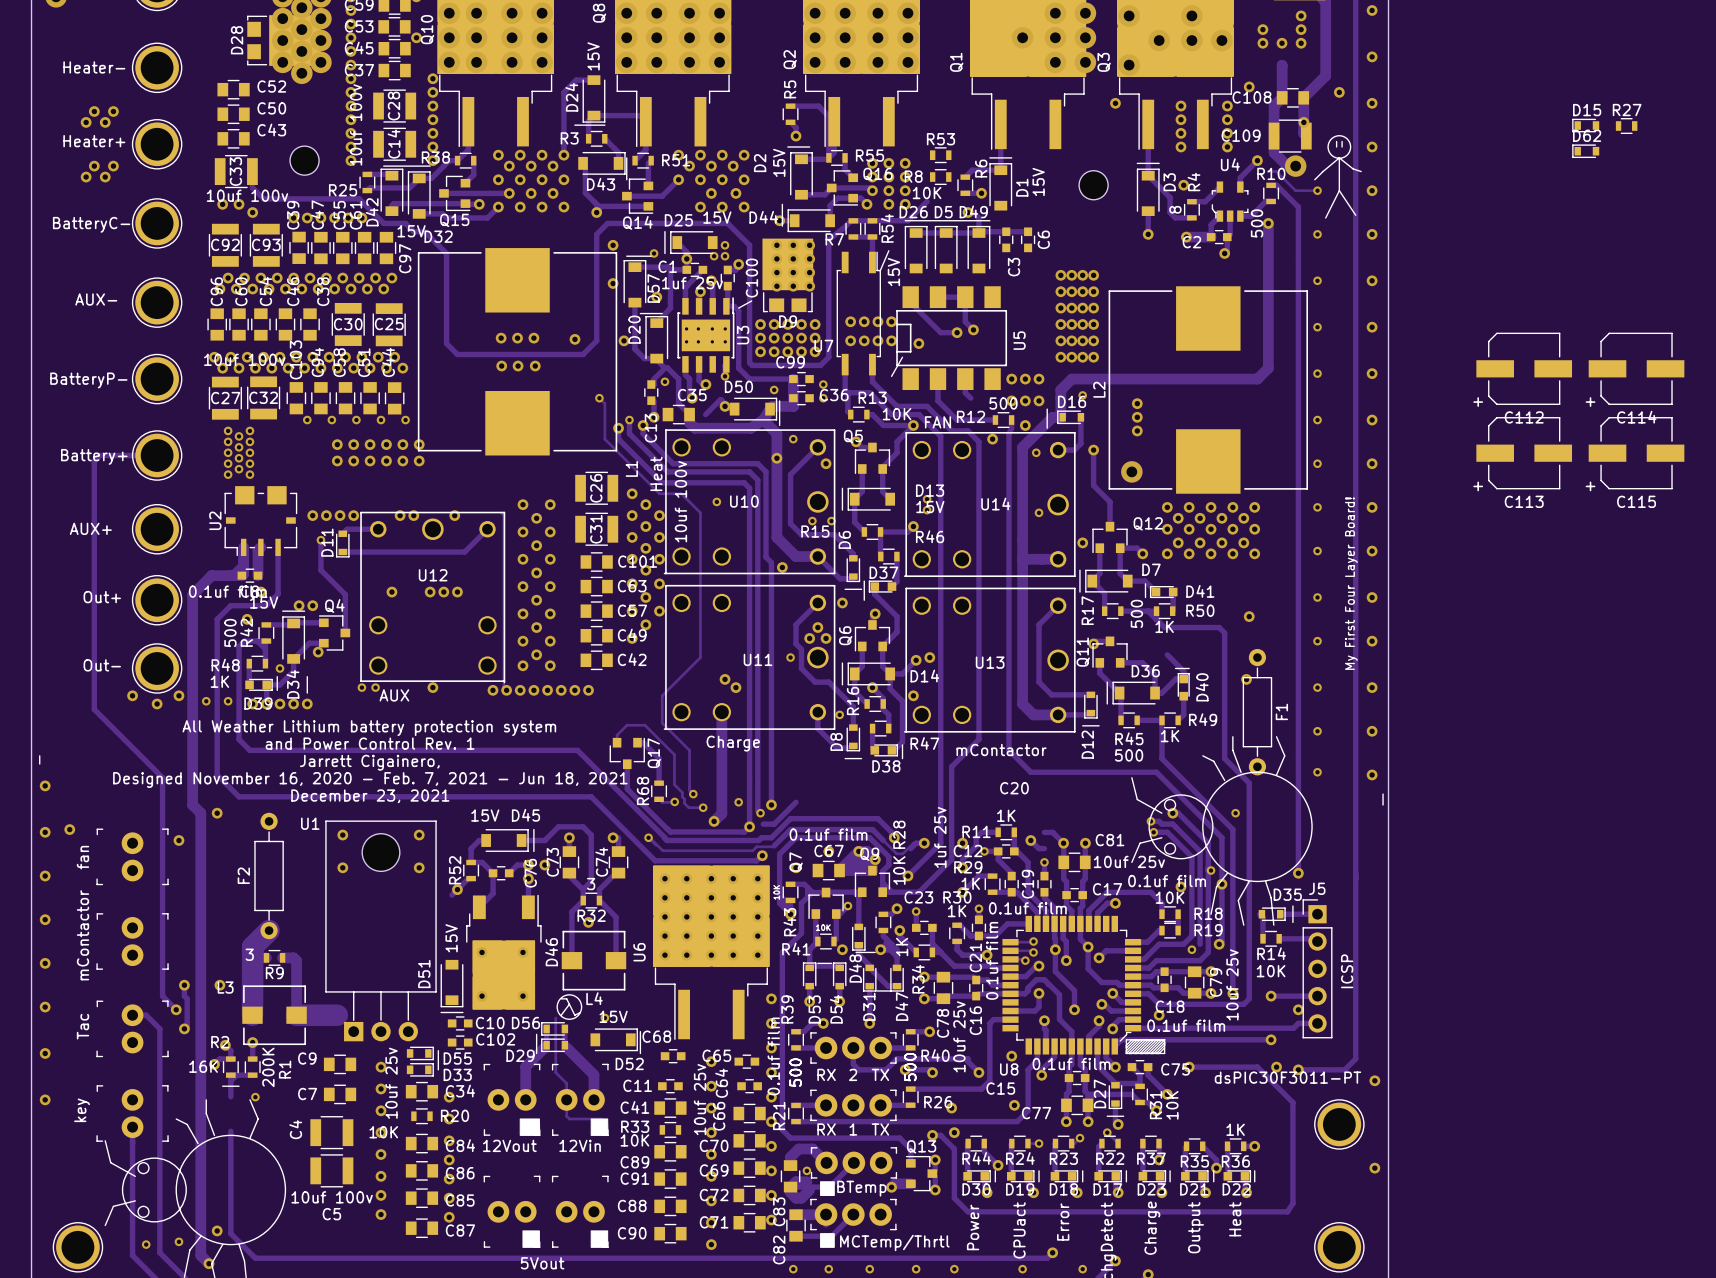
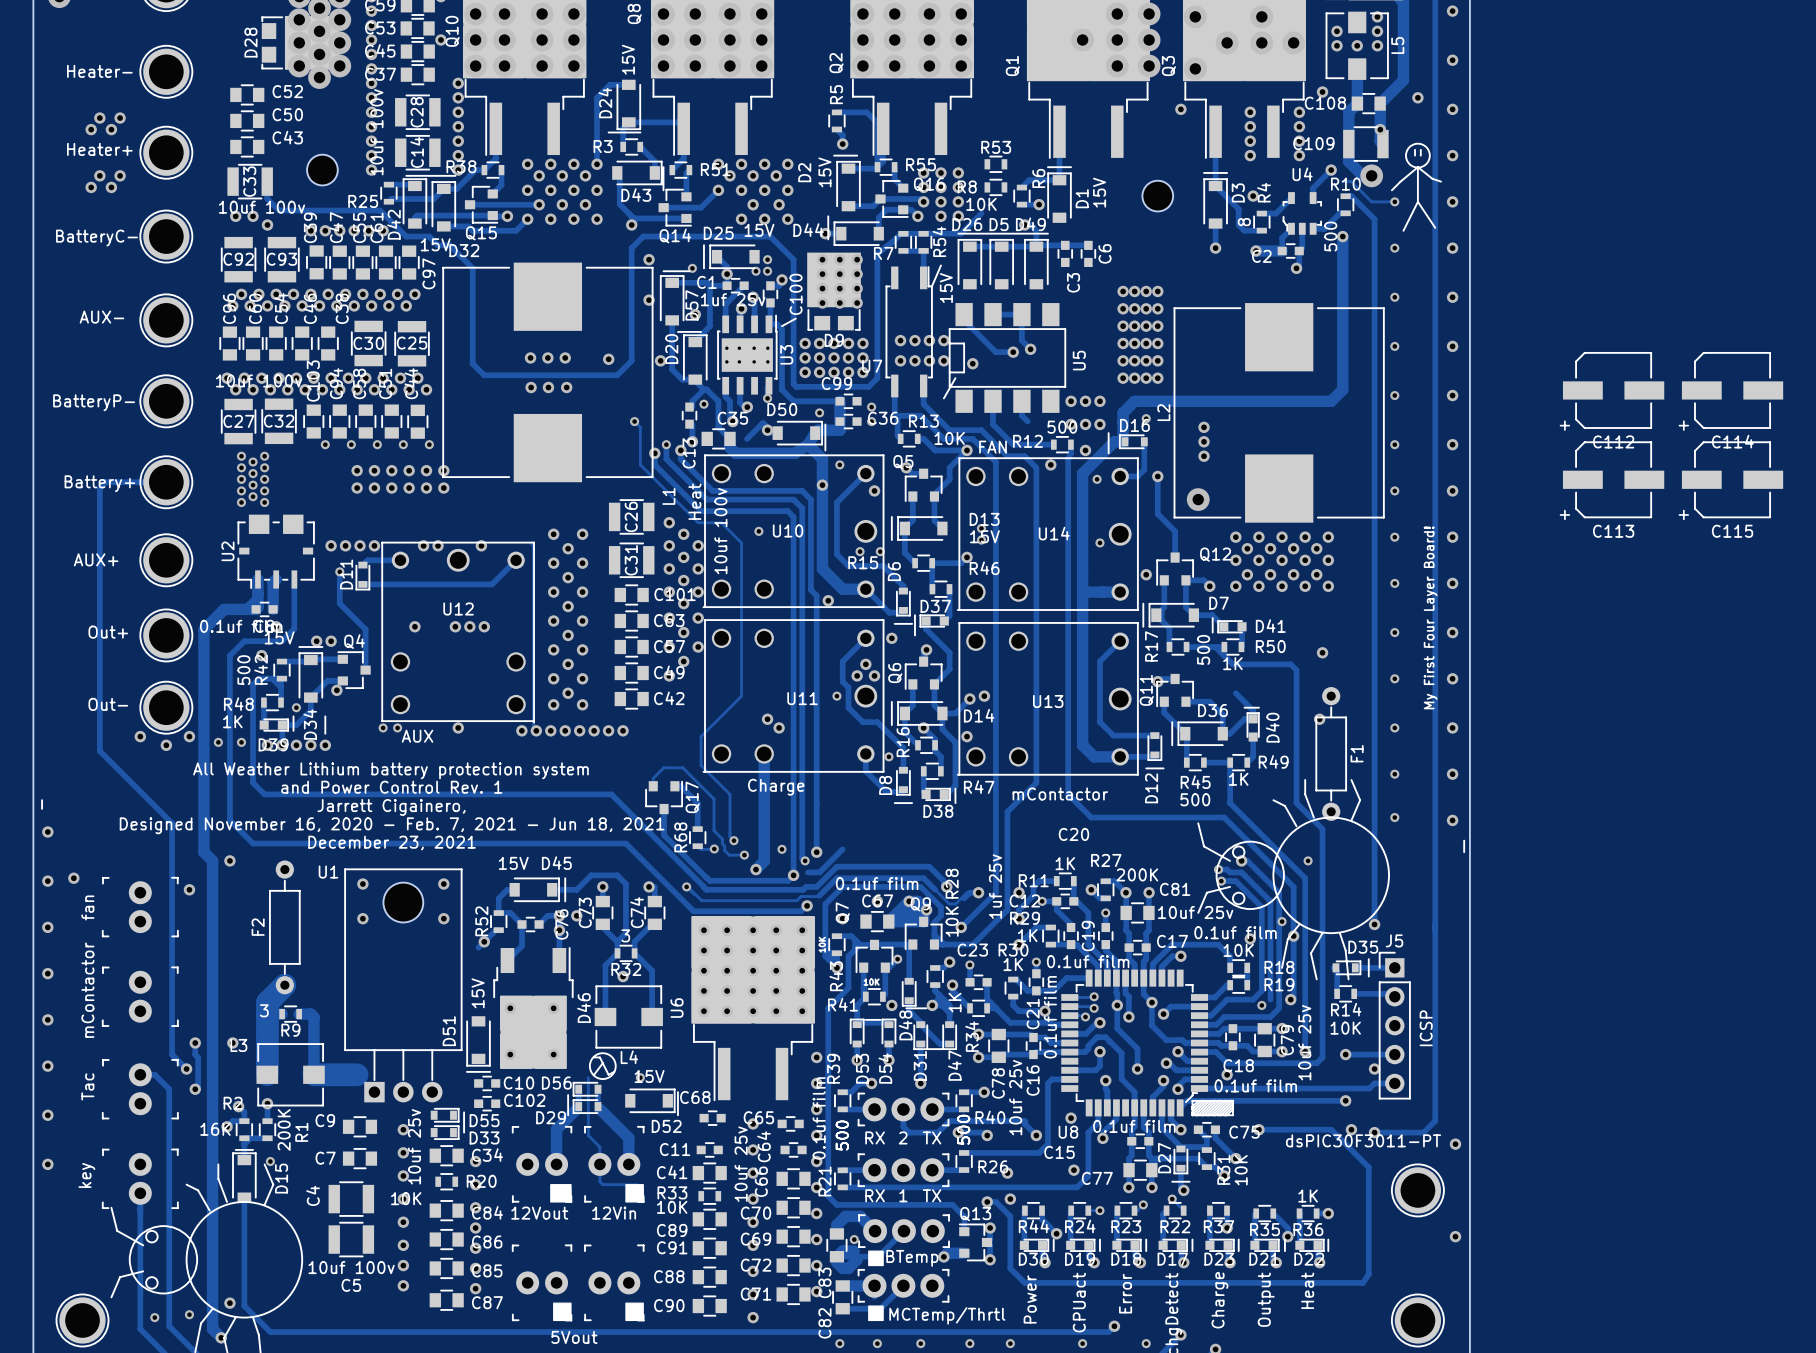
L5: none -> (1357, 45)
D15 name position: D15 (1587, 110) -> D15 (281, 1178)
D15 footprint: [1572, 118, 1600, 133] -> [232, 1152, 257, 1203]
R27 rotation: 0° (1626, 126) -> 90° clockwise (1105, 889)
R27 position: (1626, 126) -> (1105, 889)
D62: (1585, 151) -> none
R27 value: none -> 200K (1137, 874)

